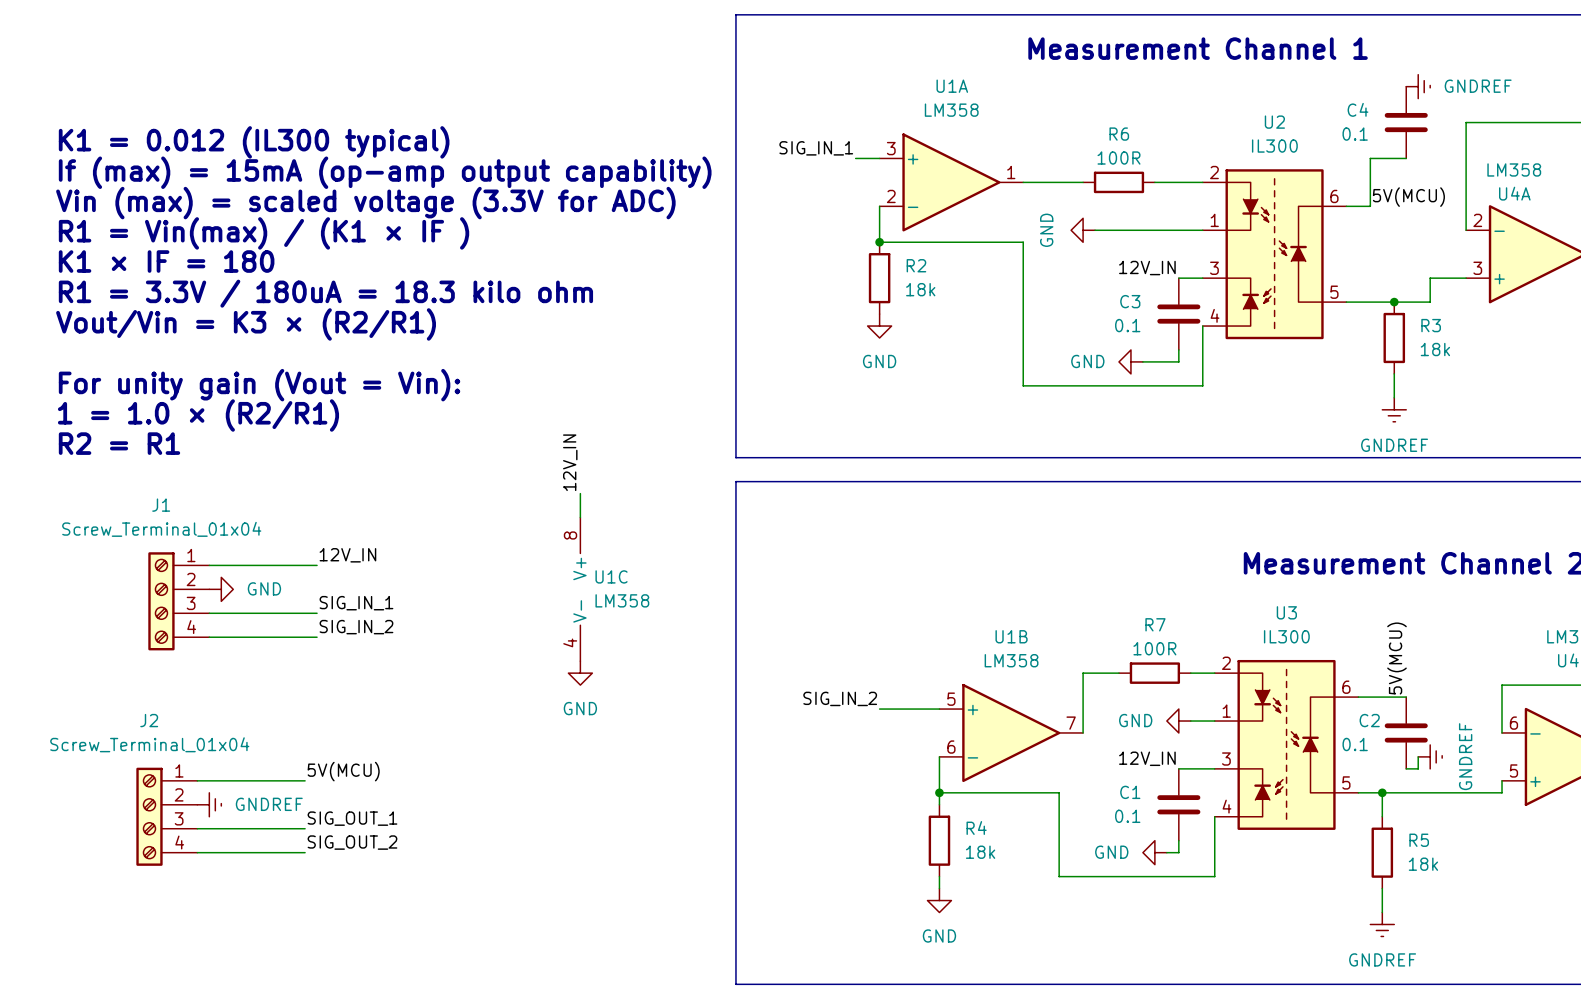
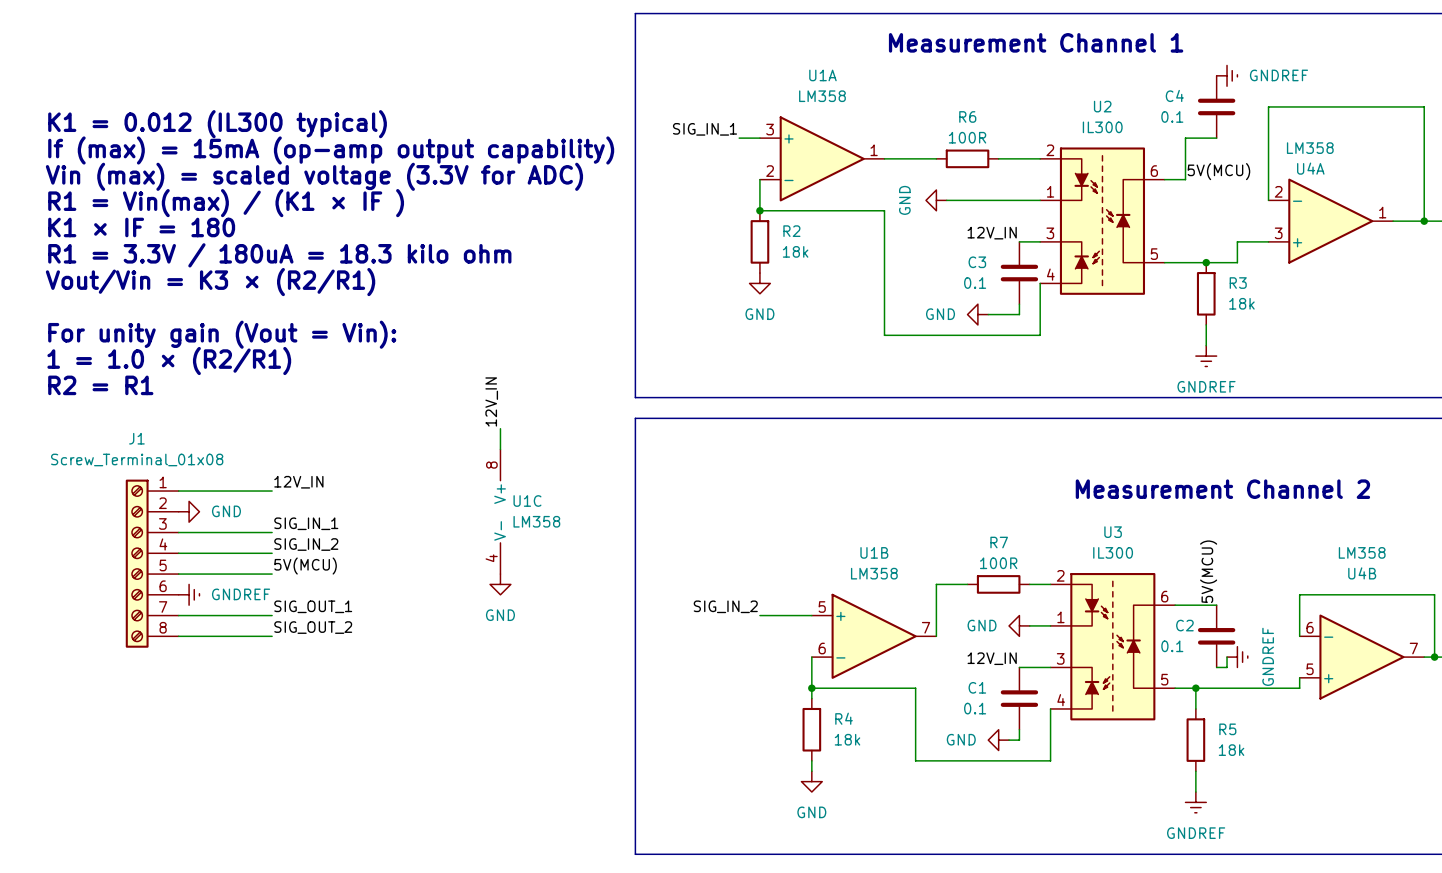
J1 value: Screw_Terminal_01x04 (161, 529) -> Screw_Terminal_01x08 (137, 459)
J1 symbol: [148, 552, 210, 651] -> [125, 479, 179, 648]
label position: 5V(MCU) (343, 771) -> 5V(MCU) (305, 566)
wire: (197, 780) (305, 780) -> (178, 636) (272, 636)
power symbol position: GNDREF (209, 804) -> GNDREF (189, 594)
J2: Screw_Terminal_01x04 (166, 816) -> none
label position: SIG_OUT_1 (352, 818) -> SIG_OUT_1 (313, 606)
wire: (197, 828) (305, 828) -> (178, 615) (272, 615)
label position: SIG_OUT_2 (352, 842) -> SIG_OUT_2 (313, 627)
wire: (197, 852) (305, 852) -> (178, 574) (272, 574)

